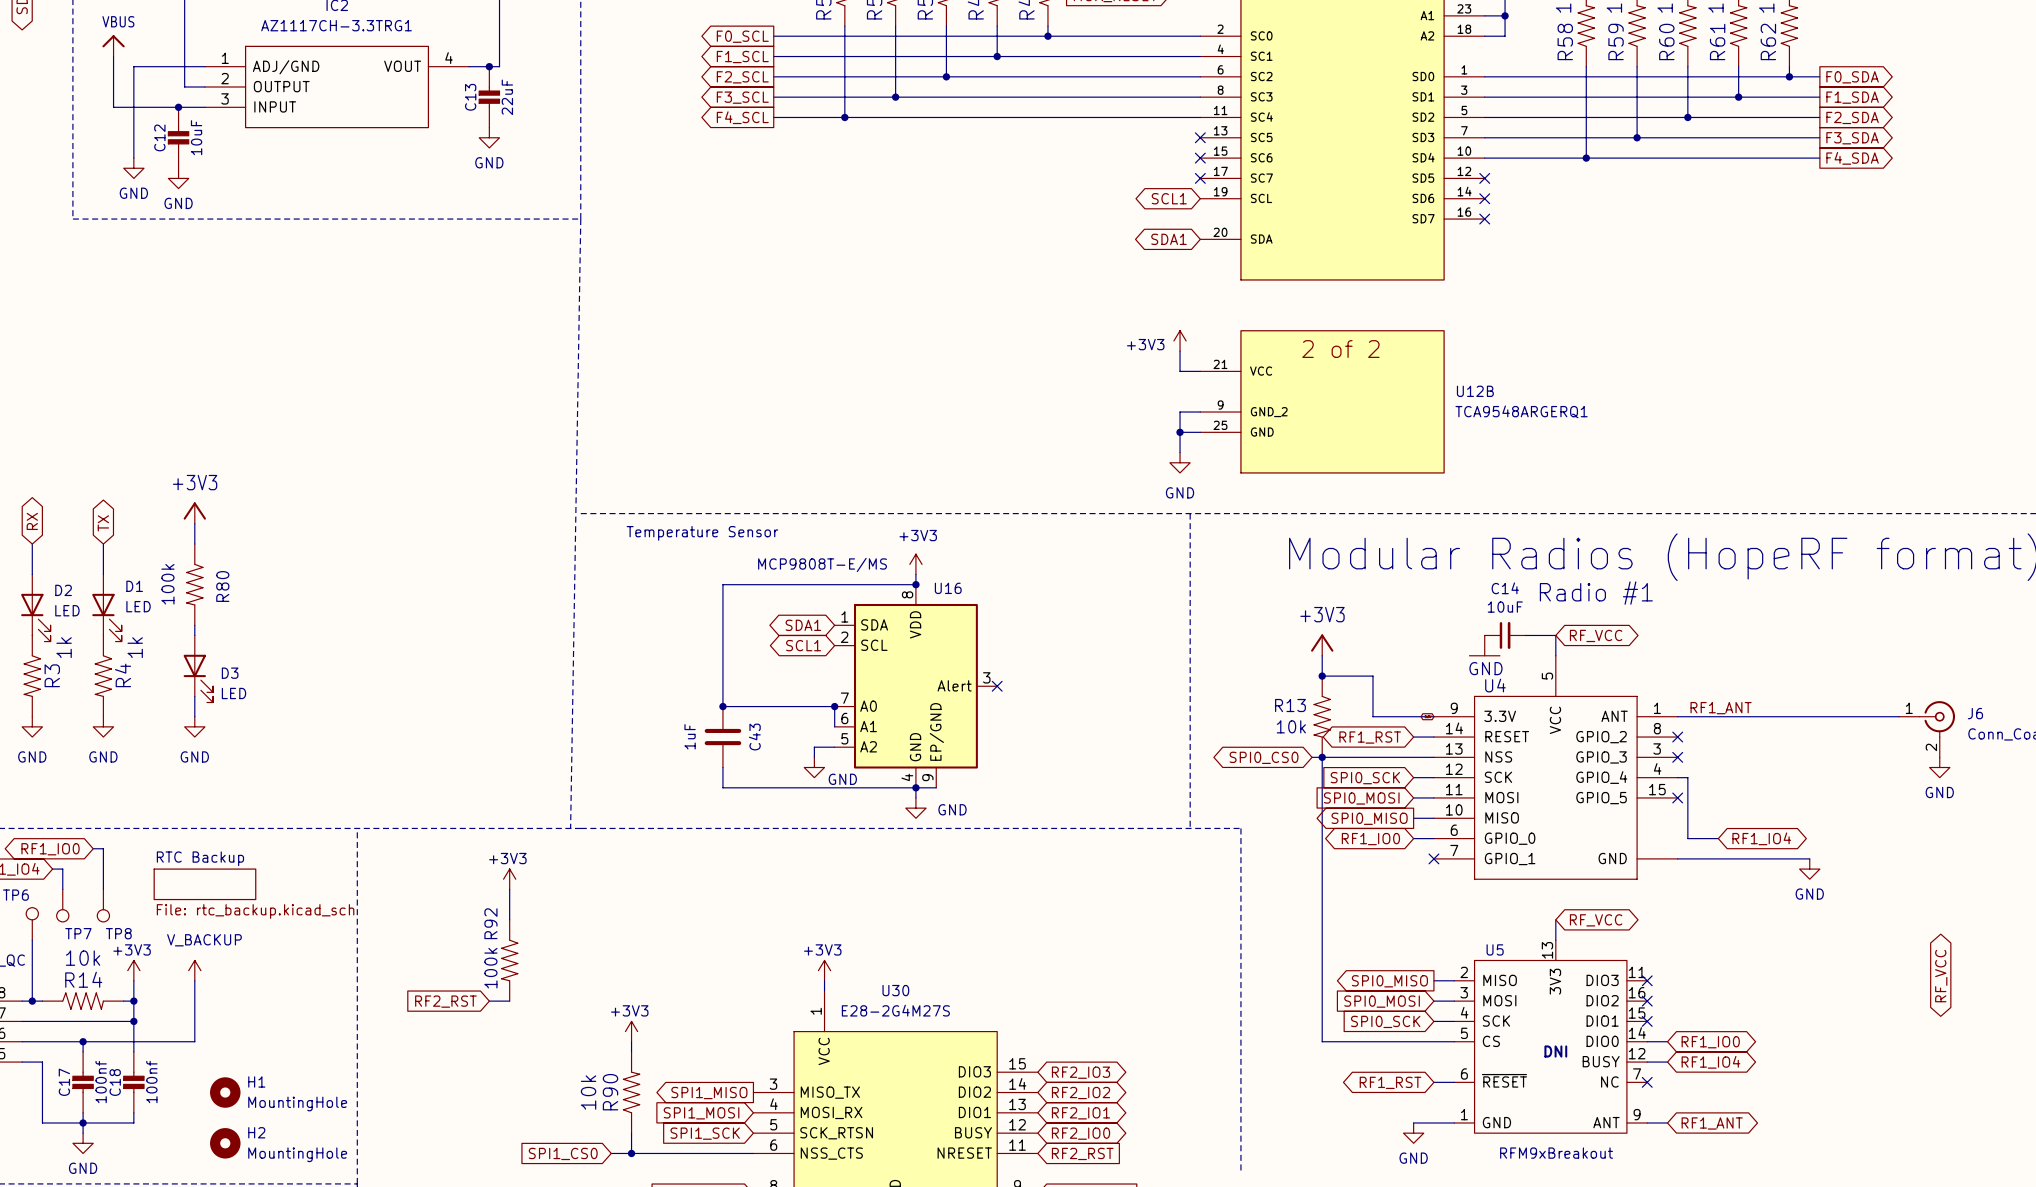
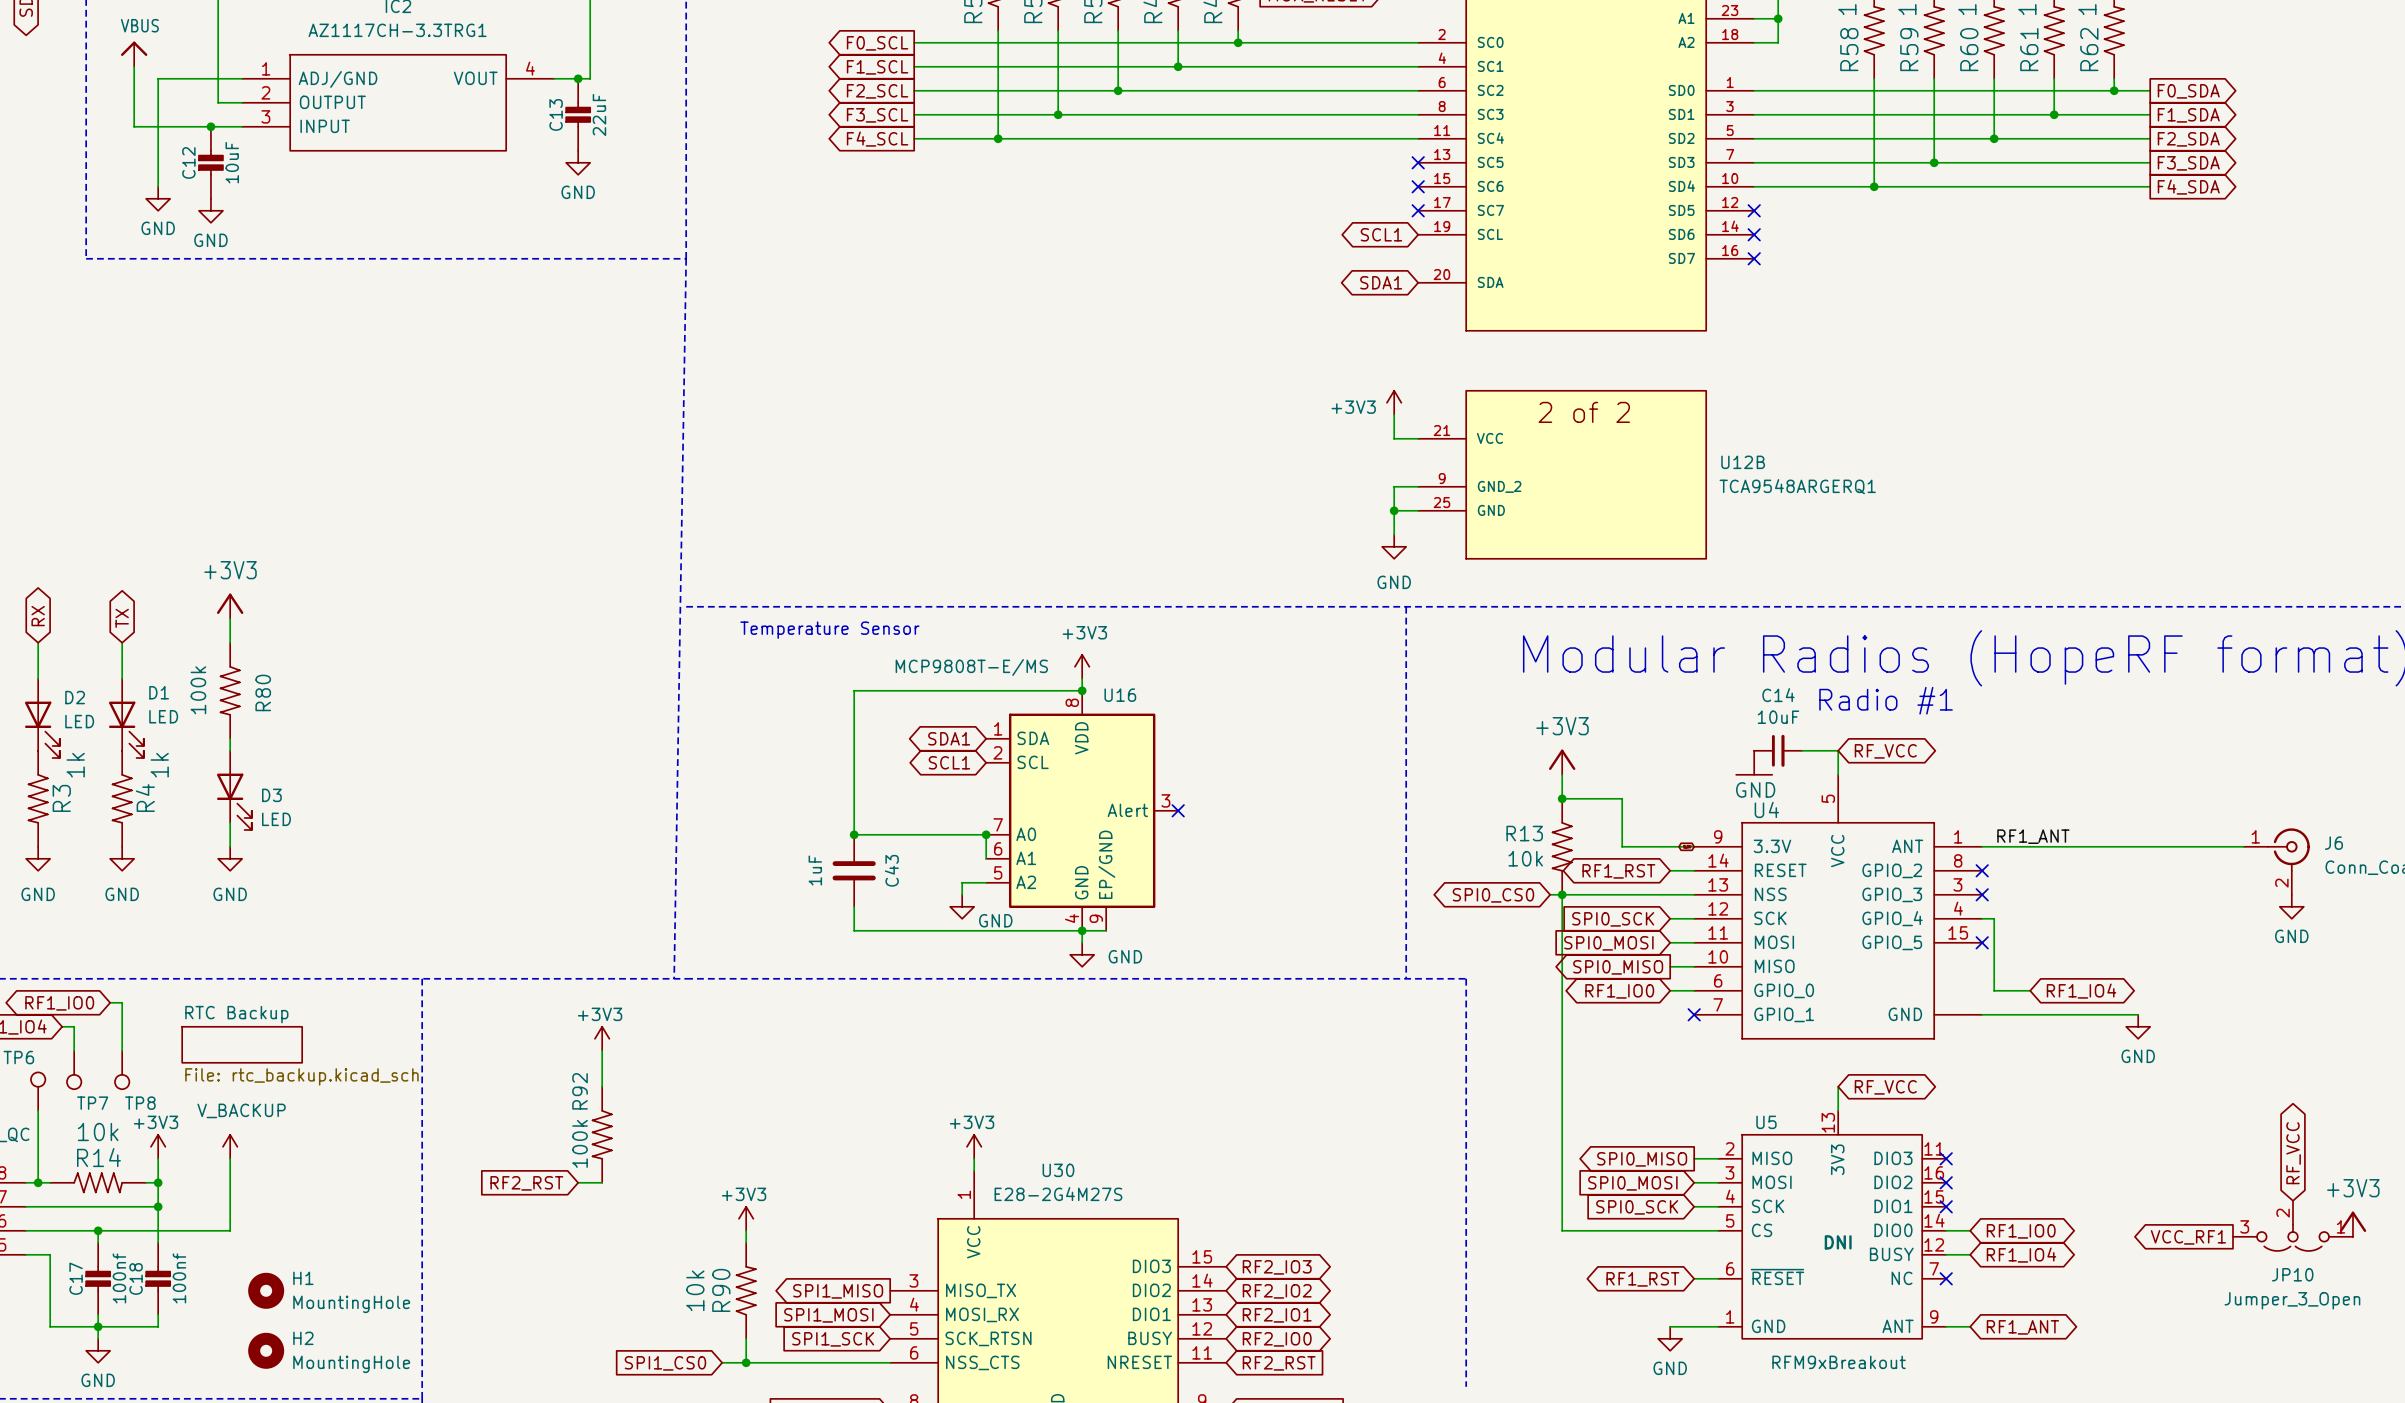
power symbol: none -> +3V3 (2352, 1224)
JP10: none -> Jumper_3_Open (2292, 1225)
global label: none -> VCC_RF1 (2188, 1237)

